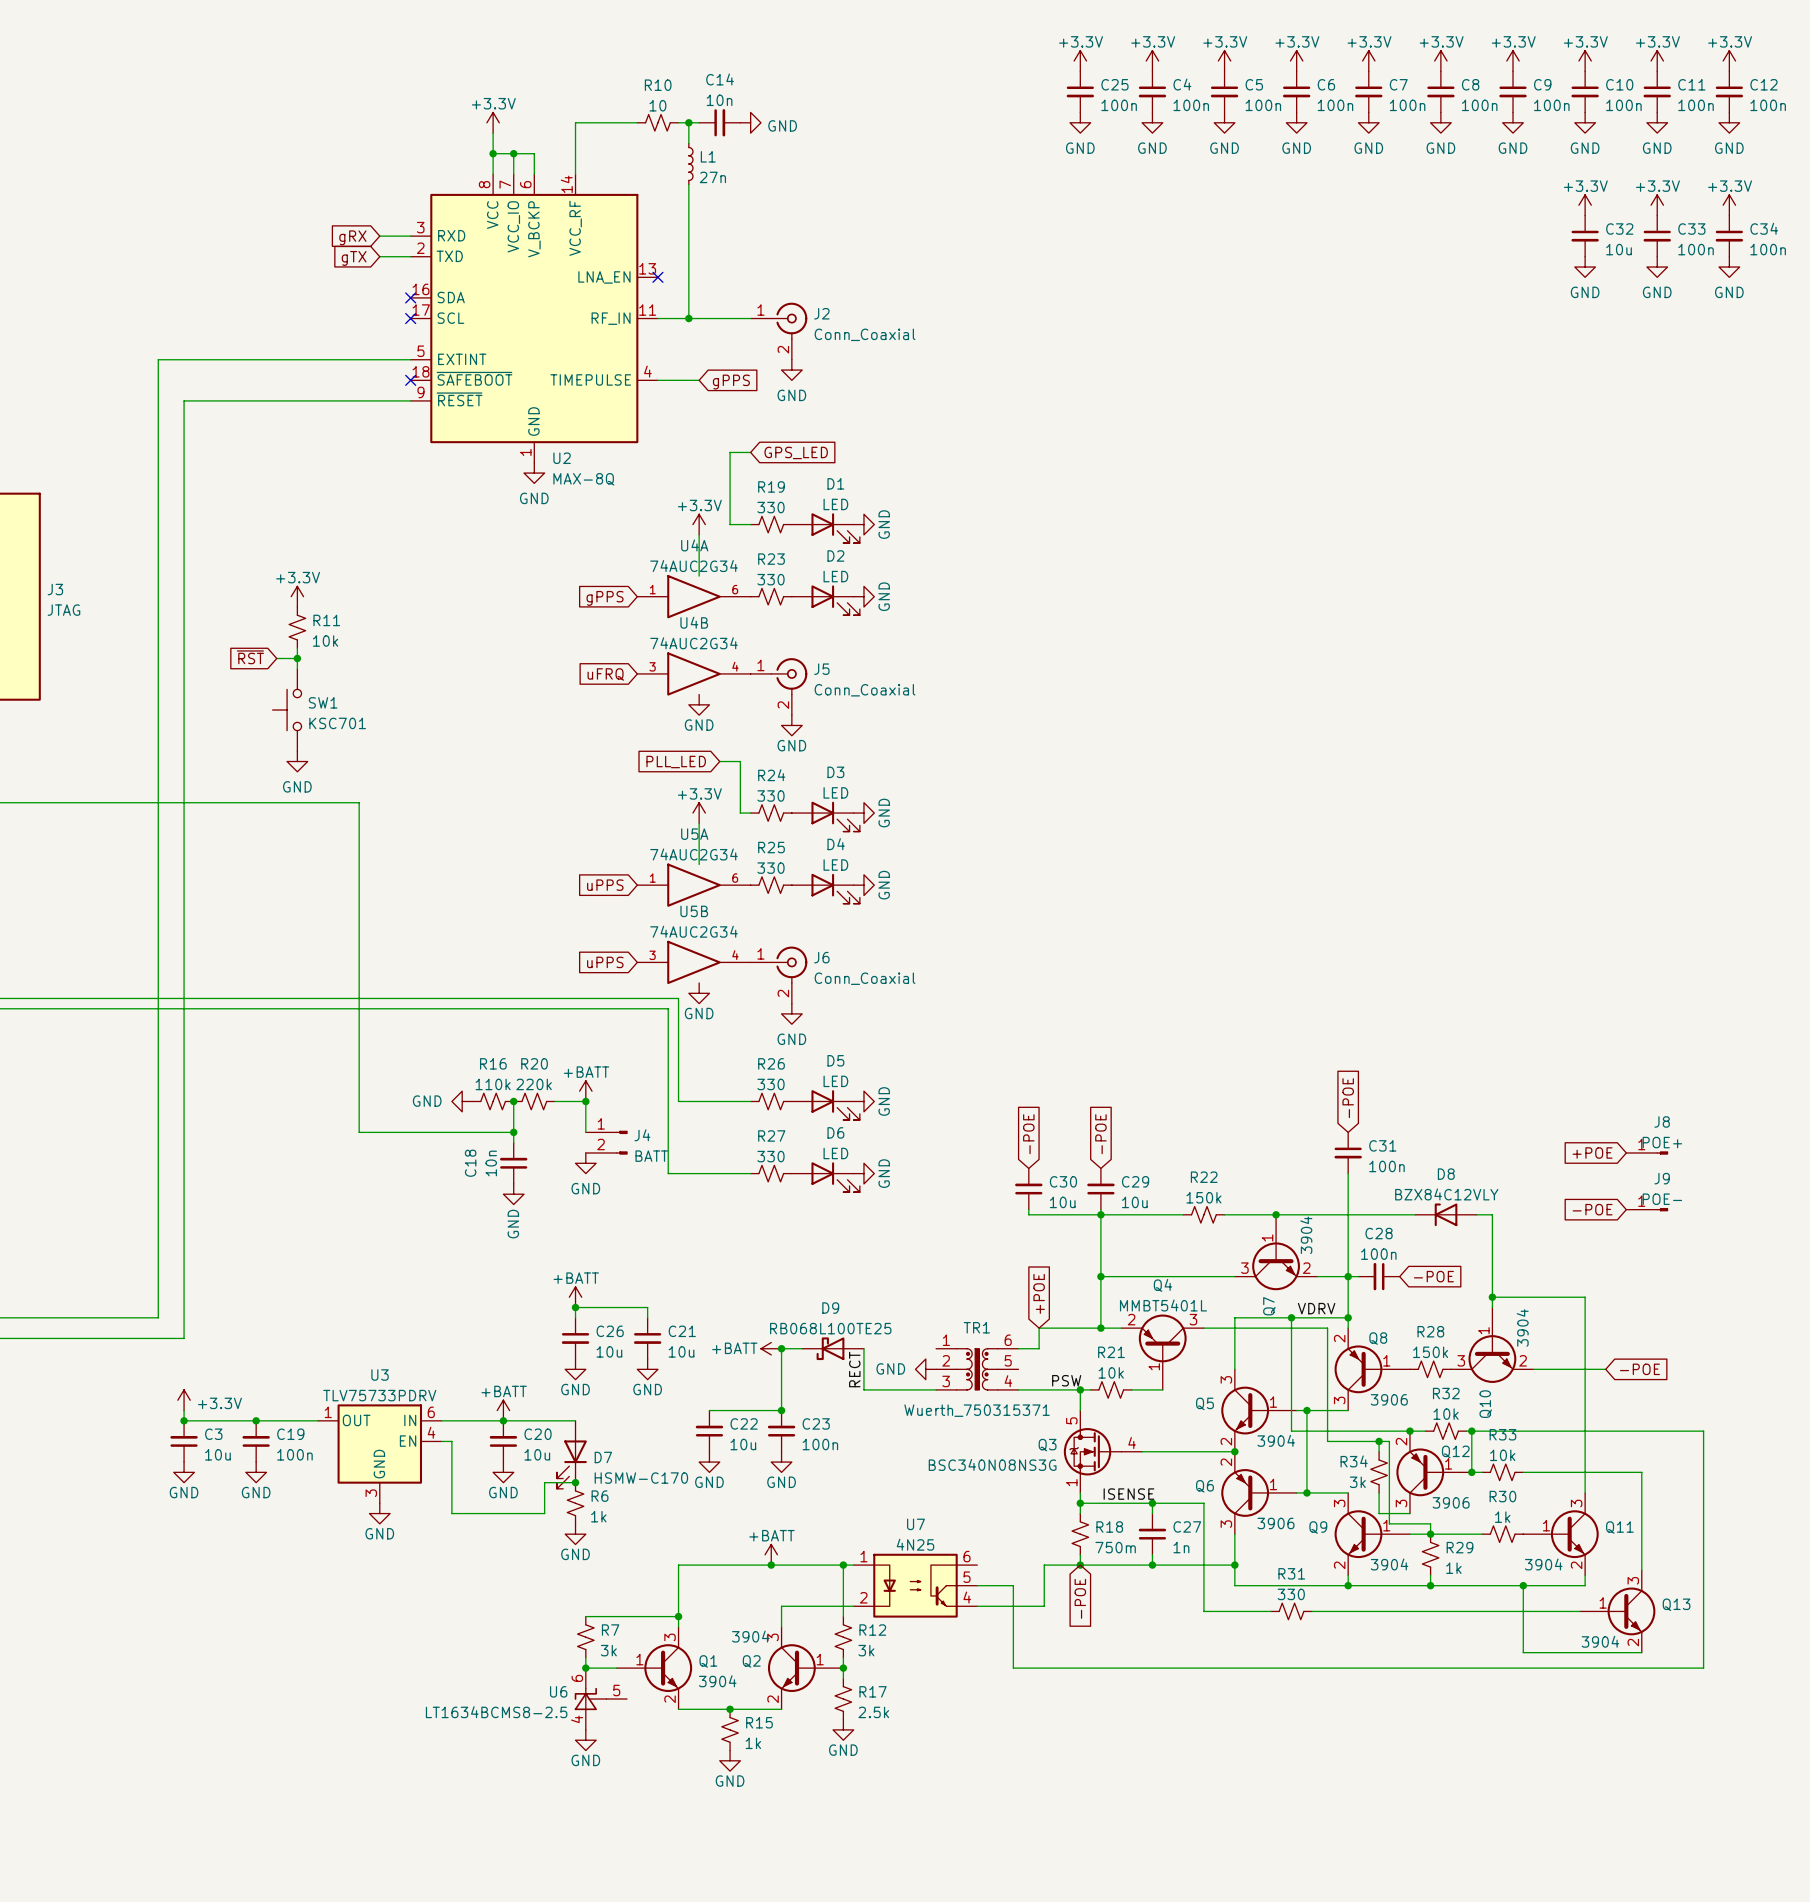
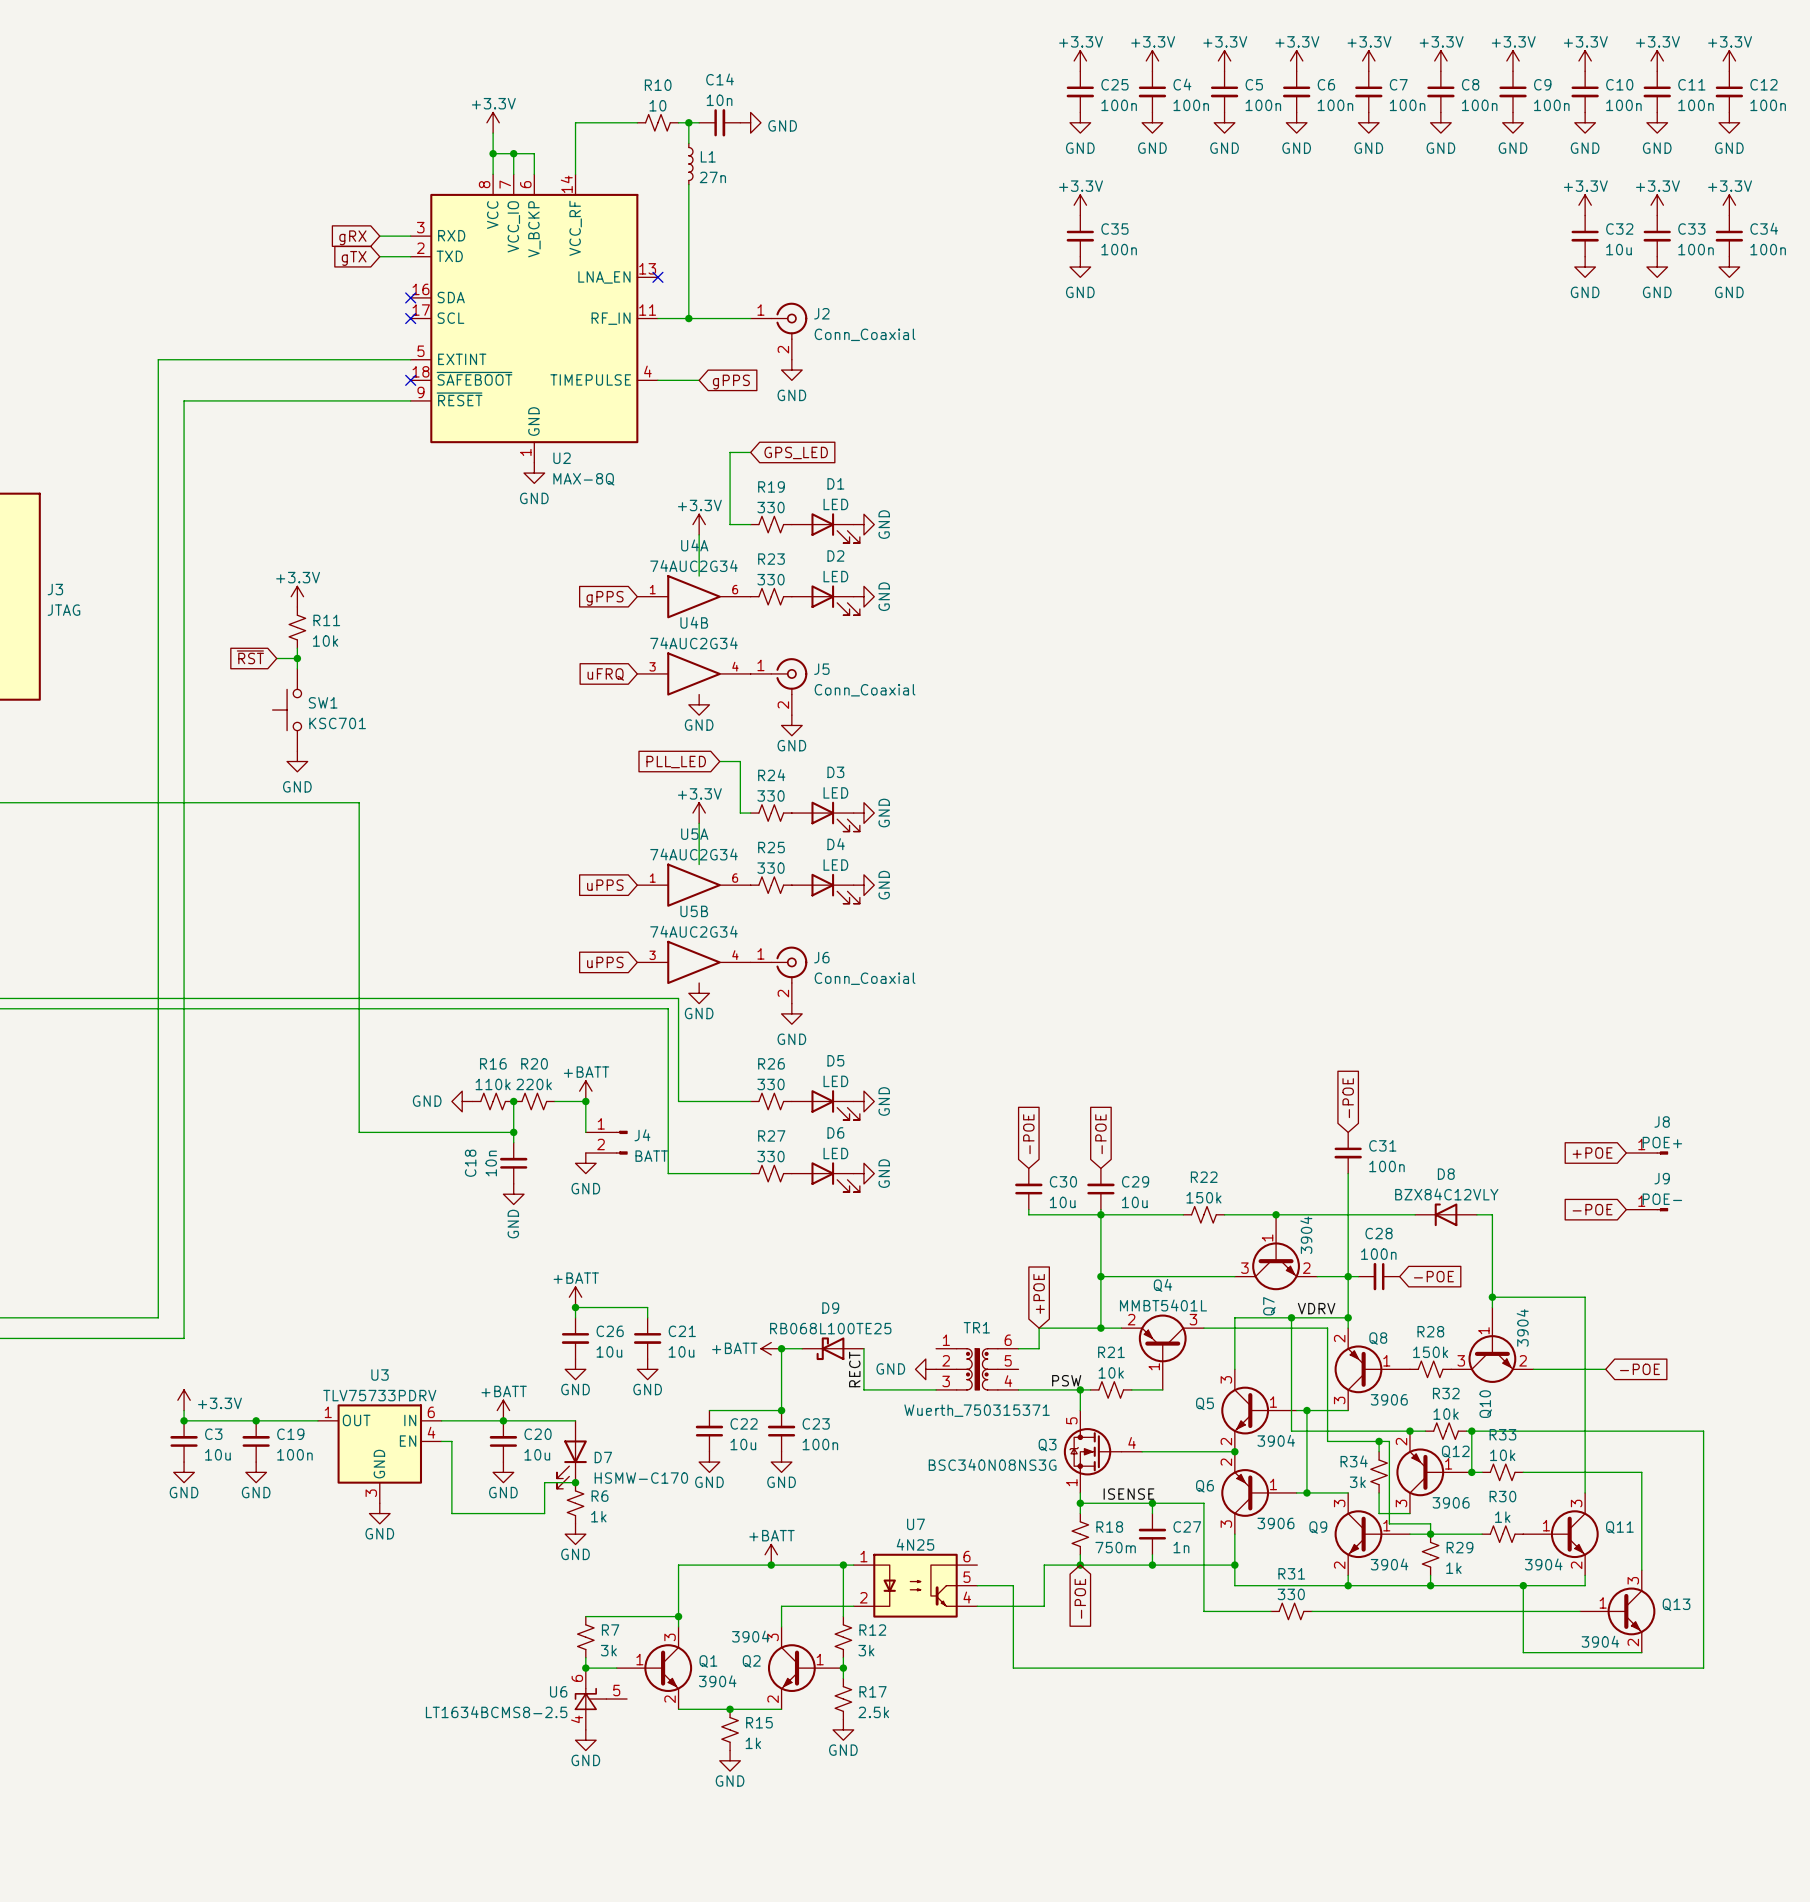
power symbol: none -> +3.3V (1080, 205)
C35: none -> 100n (1080, 236)
power symbol: none -> GND (1080, 267)

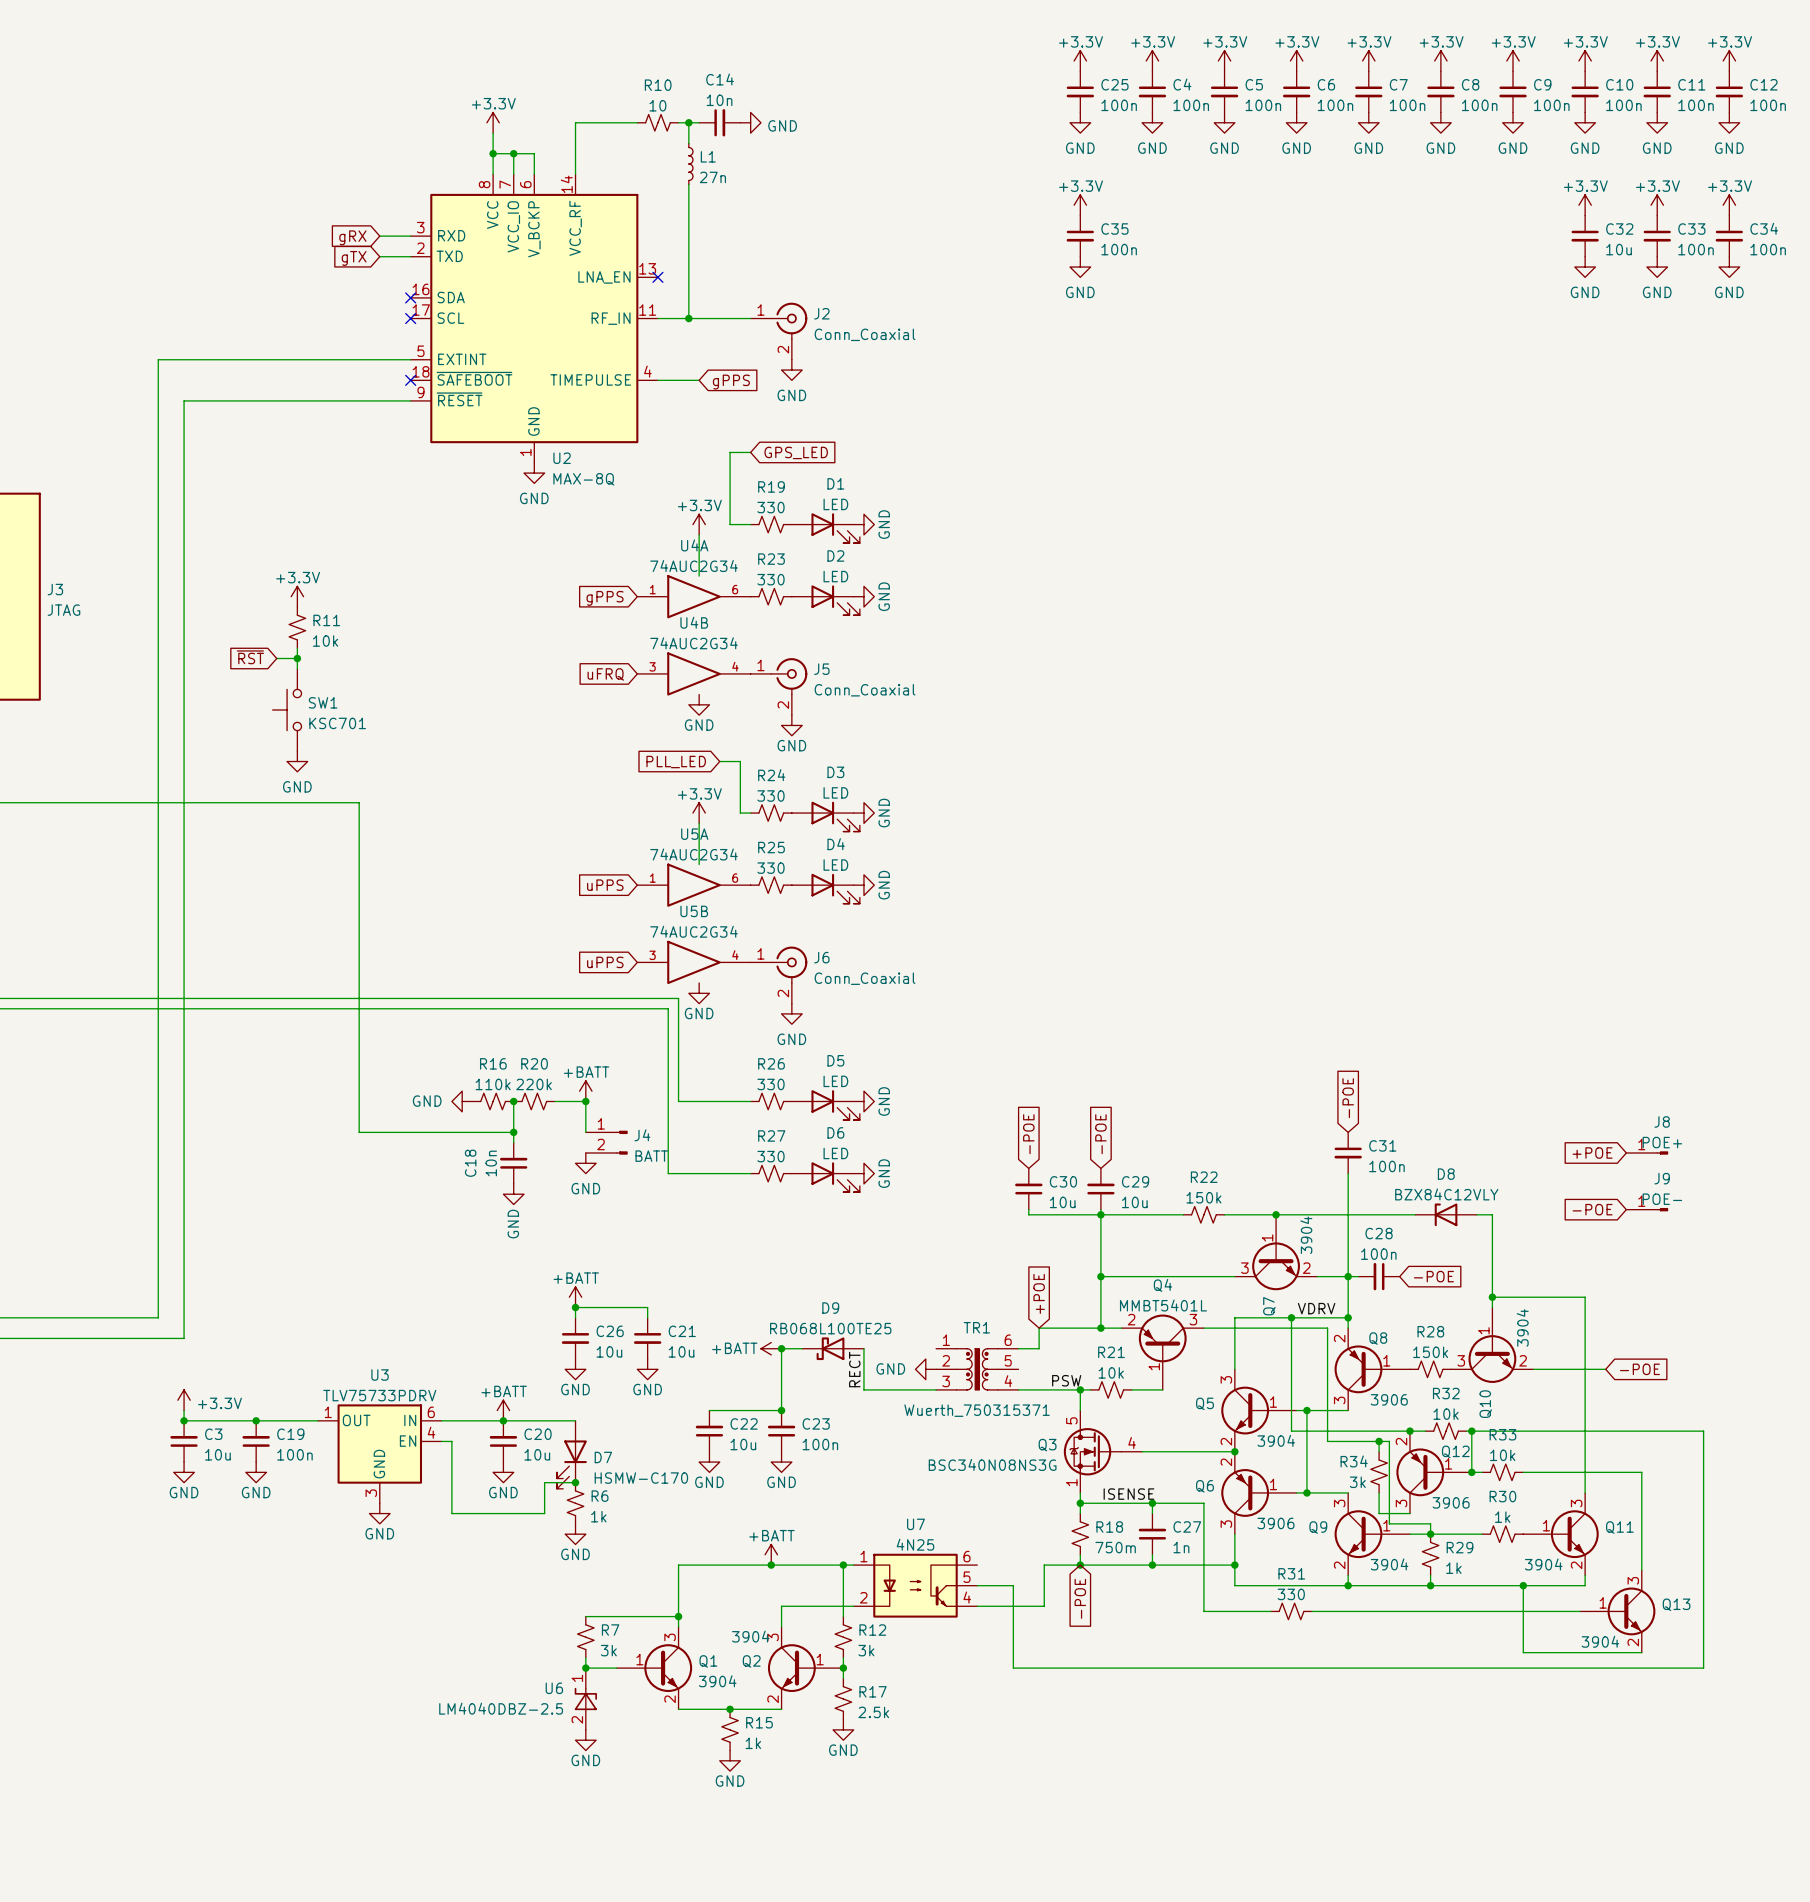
U6 symbol: [574, 1668, 628, 1730] -> [574, 1668, 597, 1730]
U6 value: LT1634BCMS8-2.5 (496, 1712) -> LM4040DBZ-2.5 (501, 1708)

